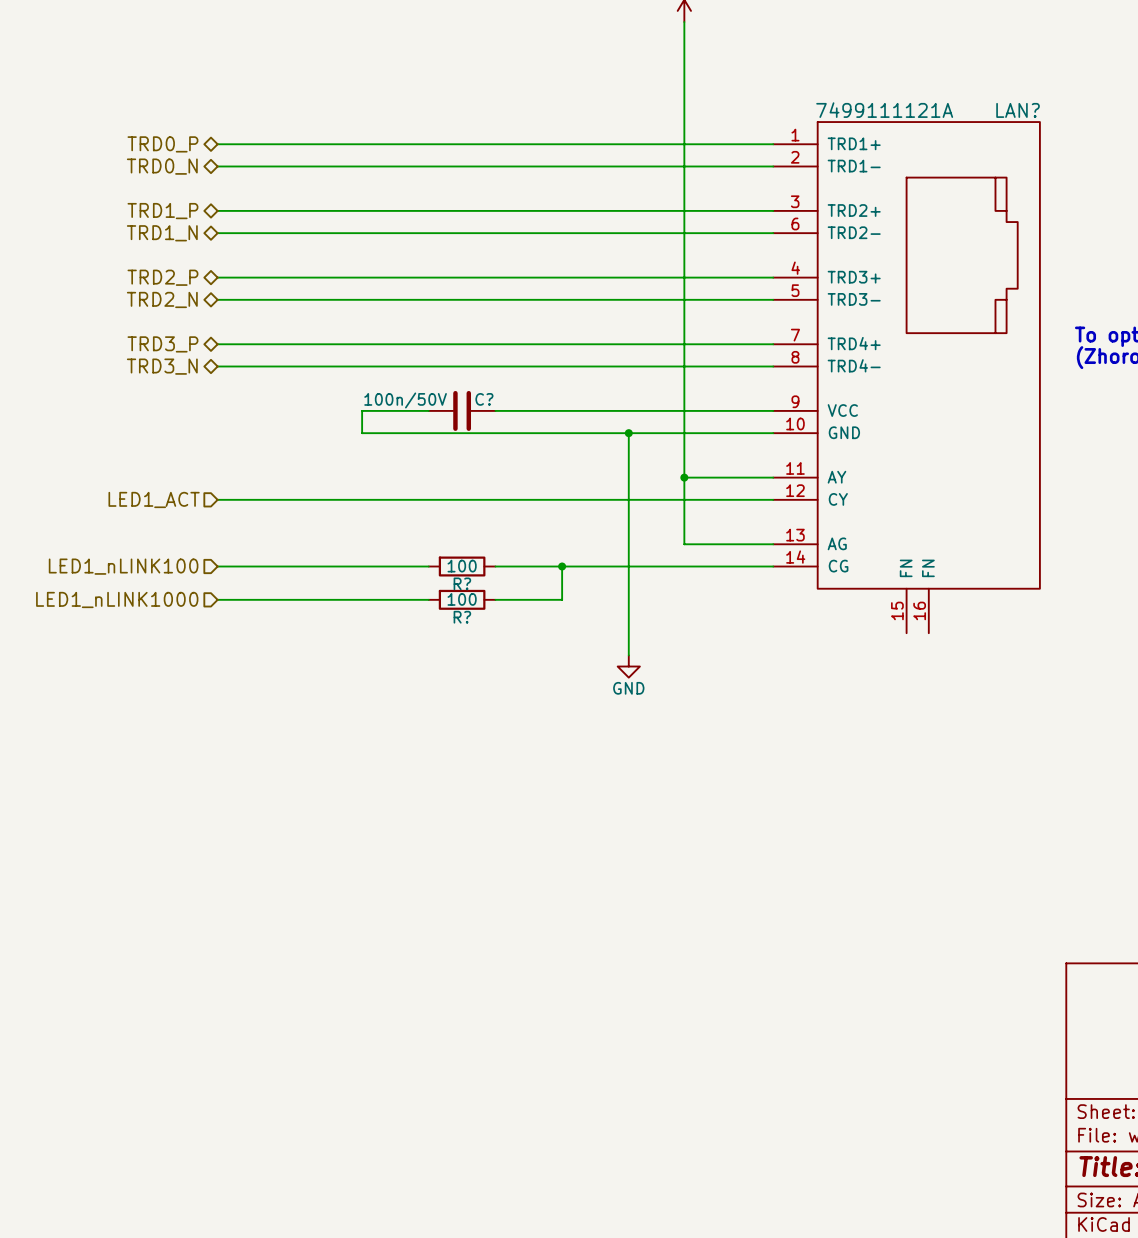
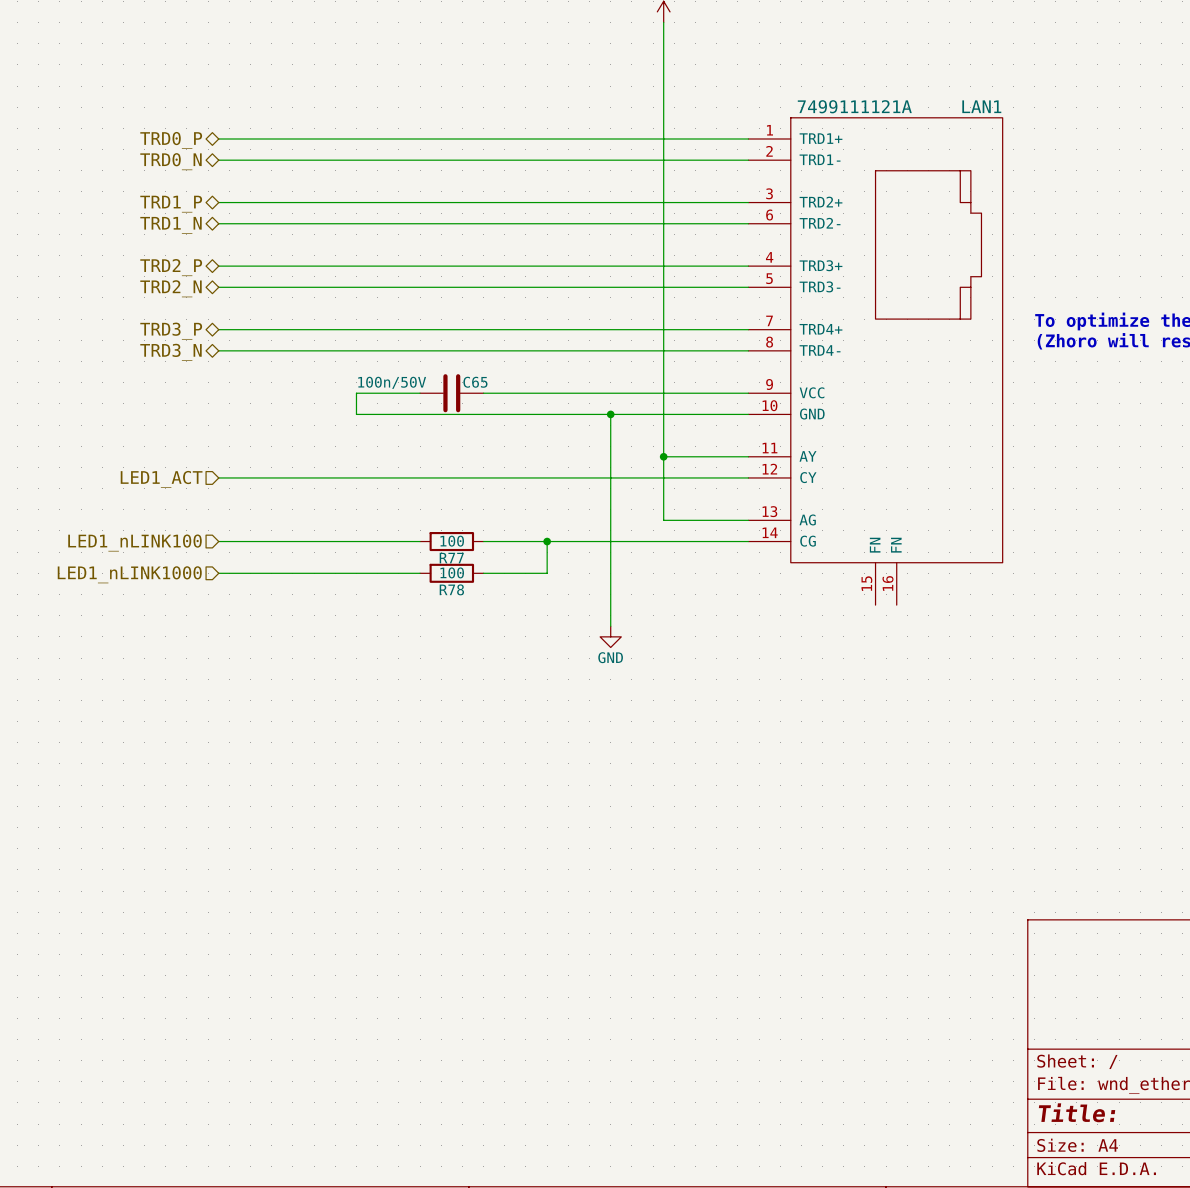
LAN? name: LAN? (1018, 110) -> LAN1 (981, 106)
C? name: C? (484, 399) -> C65 (475, 382)
R? name: R? (462, 583) -> R77 (451, 558)
R? name: R? (462, 617) -> R78 (451, 589)

